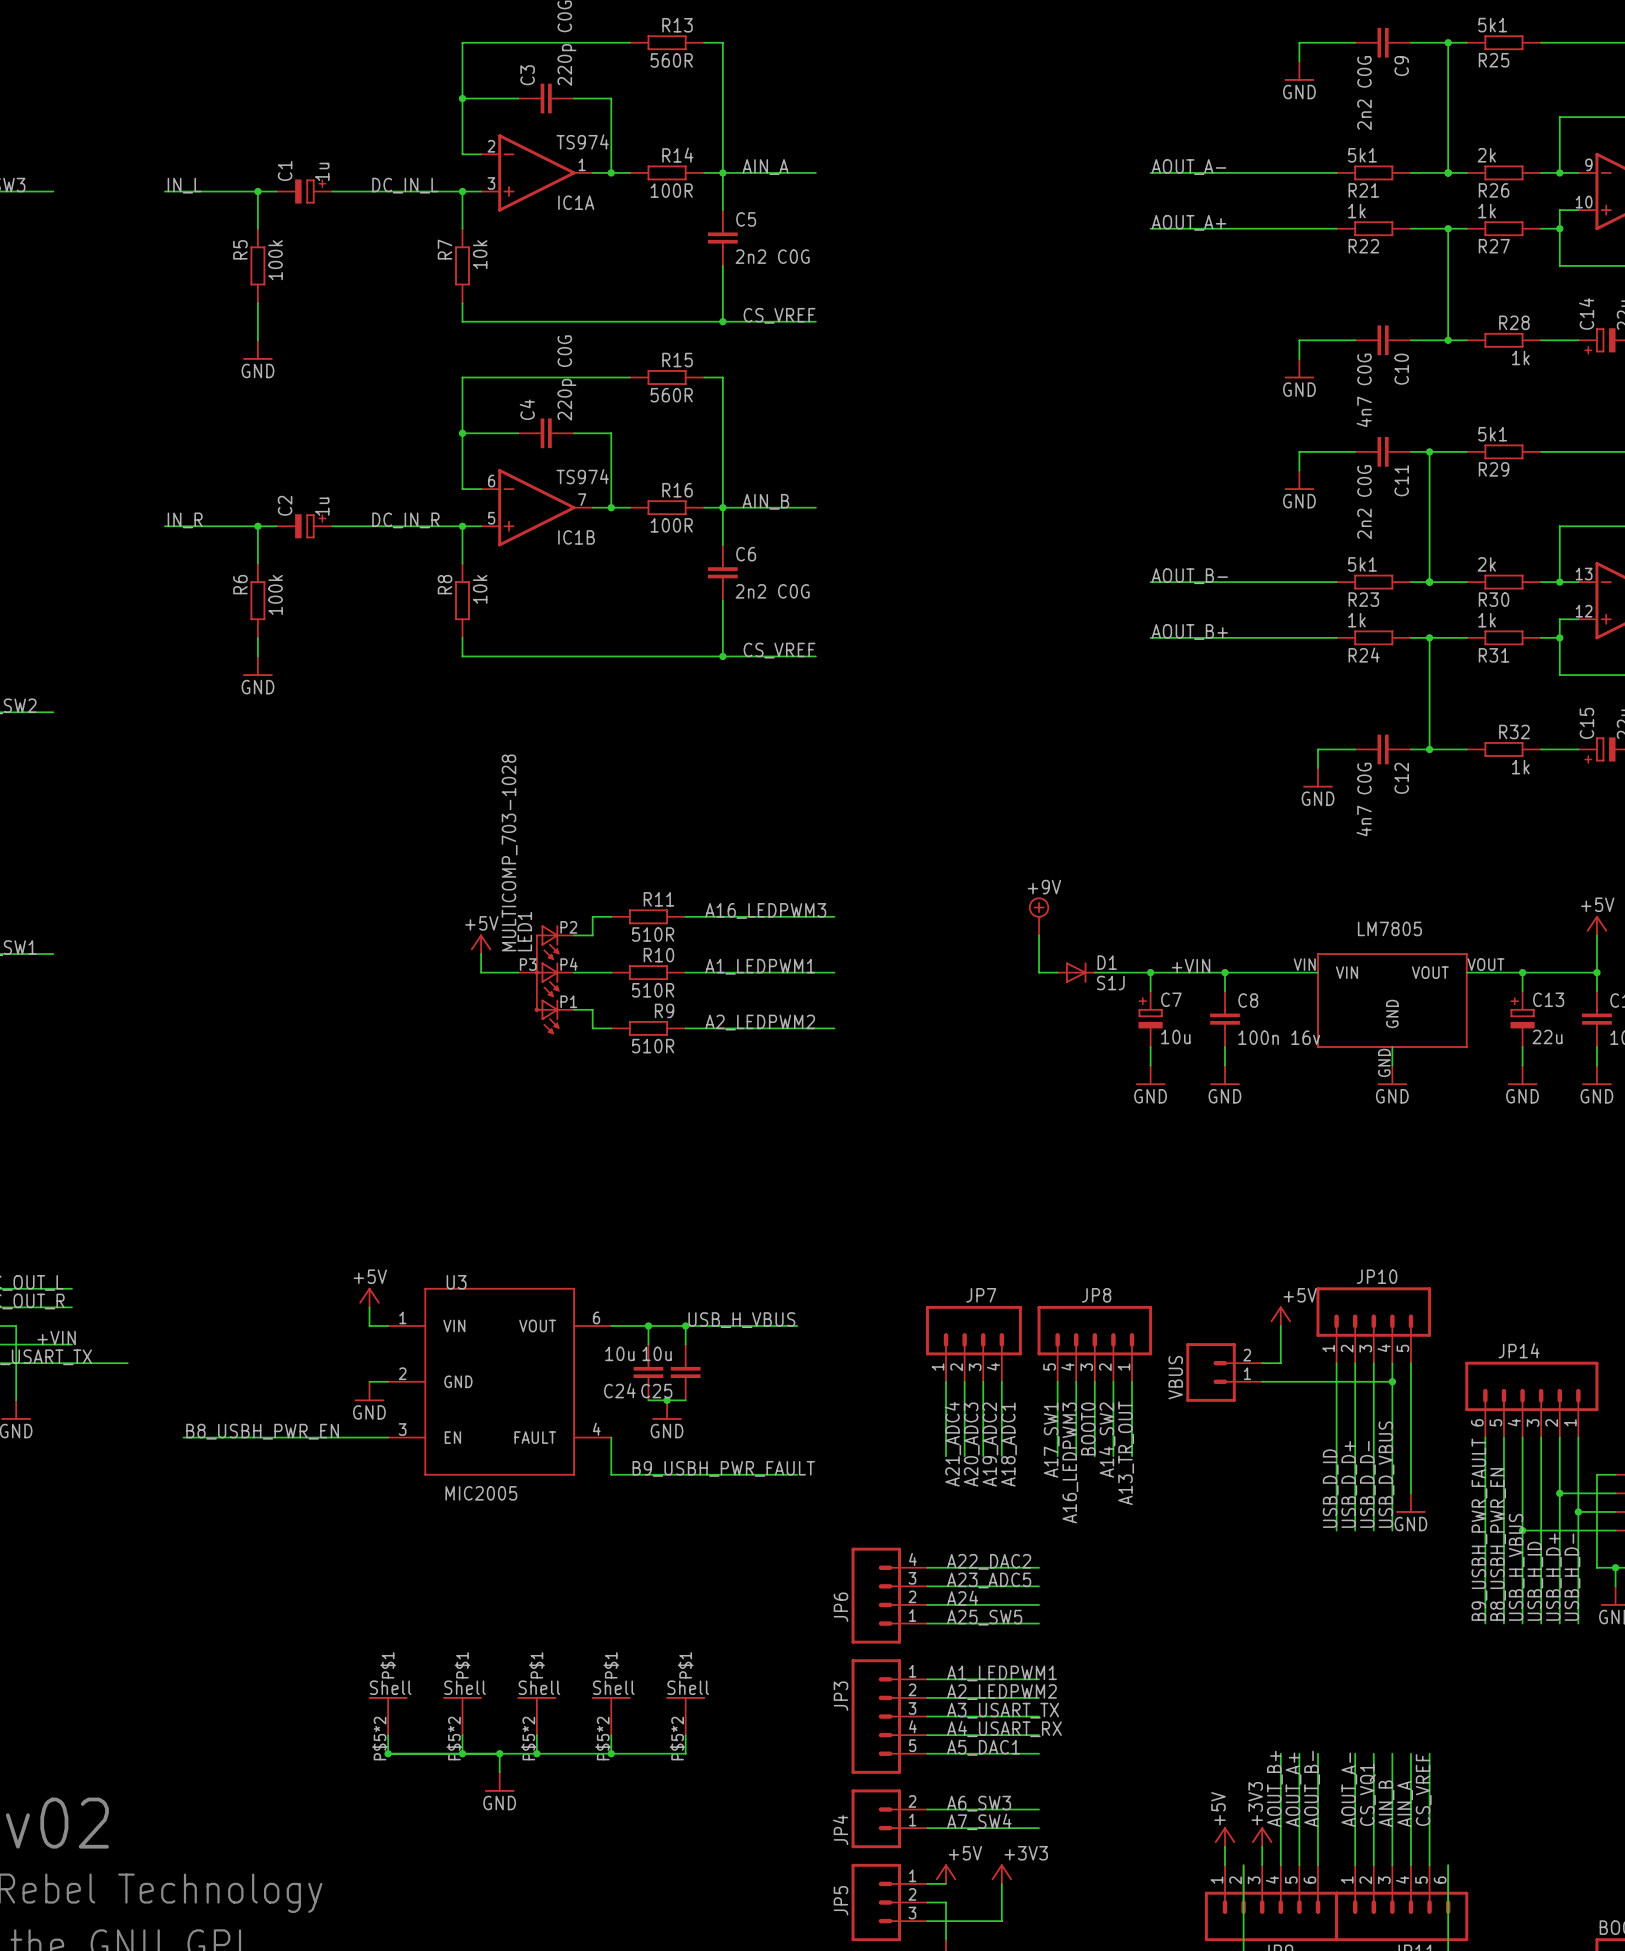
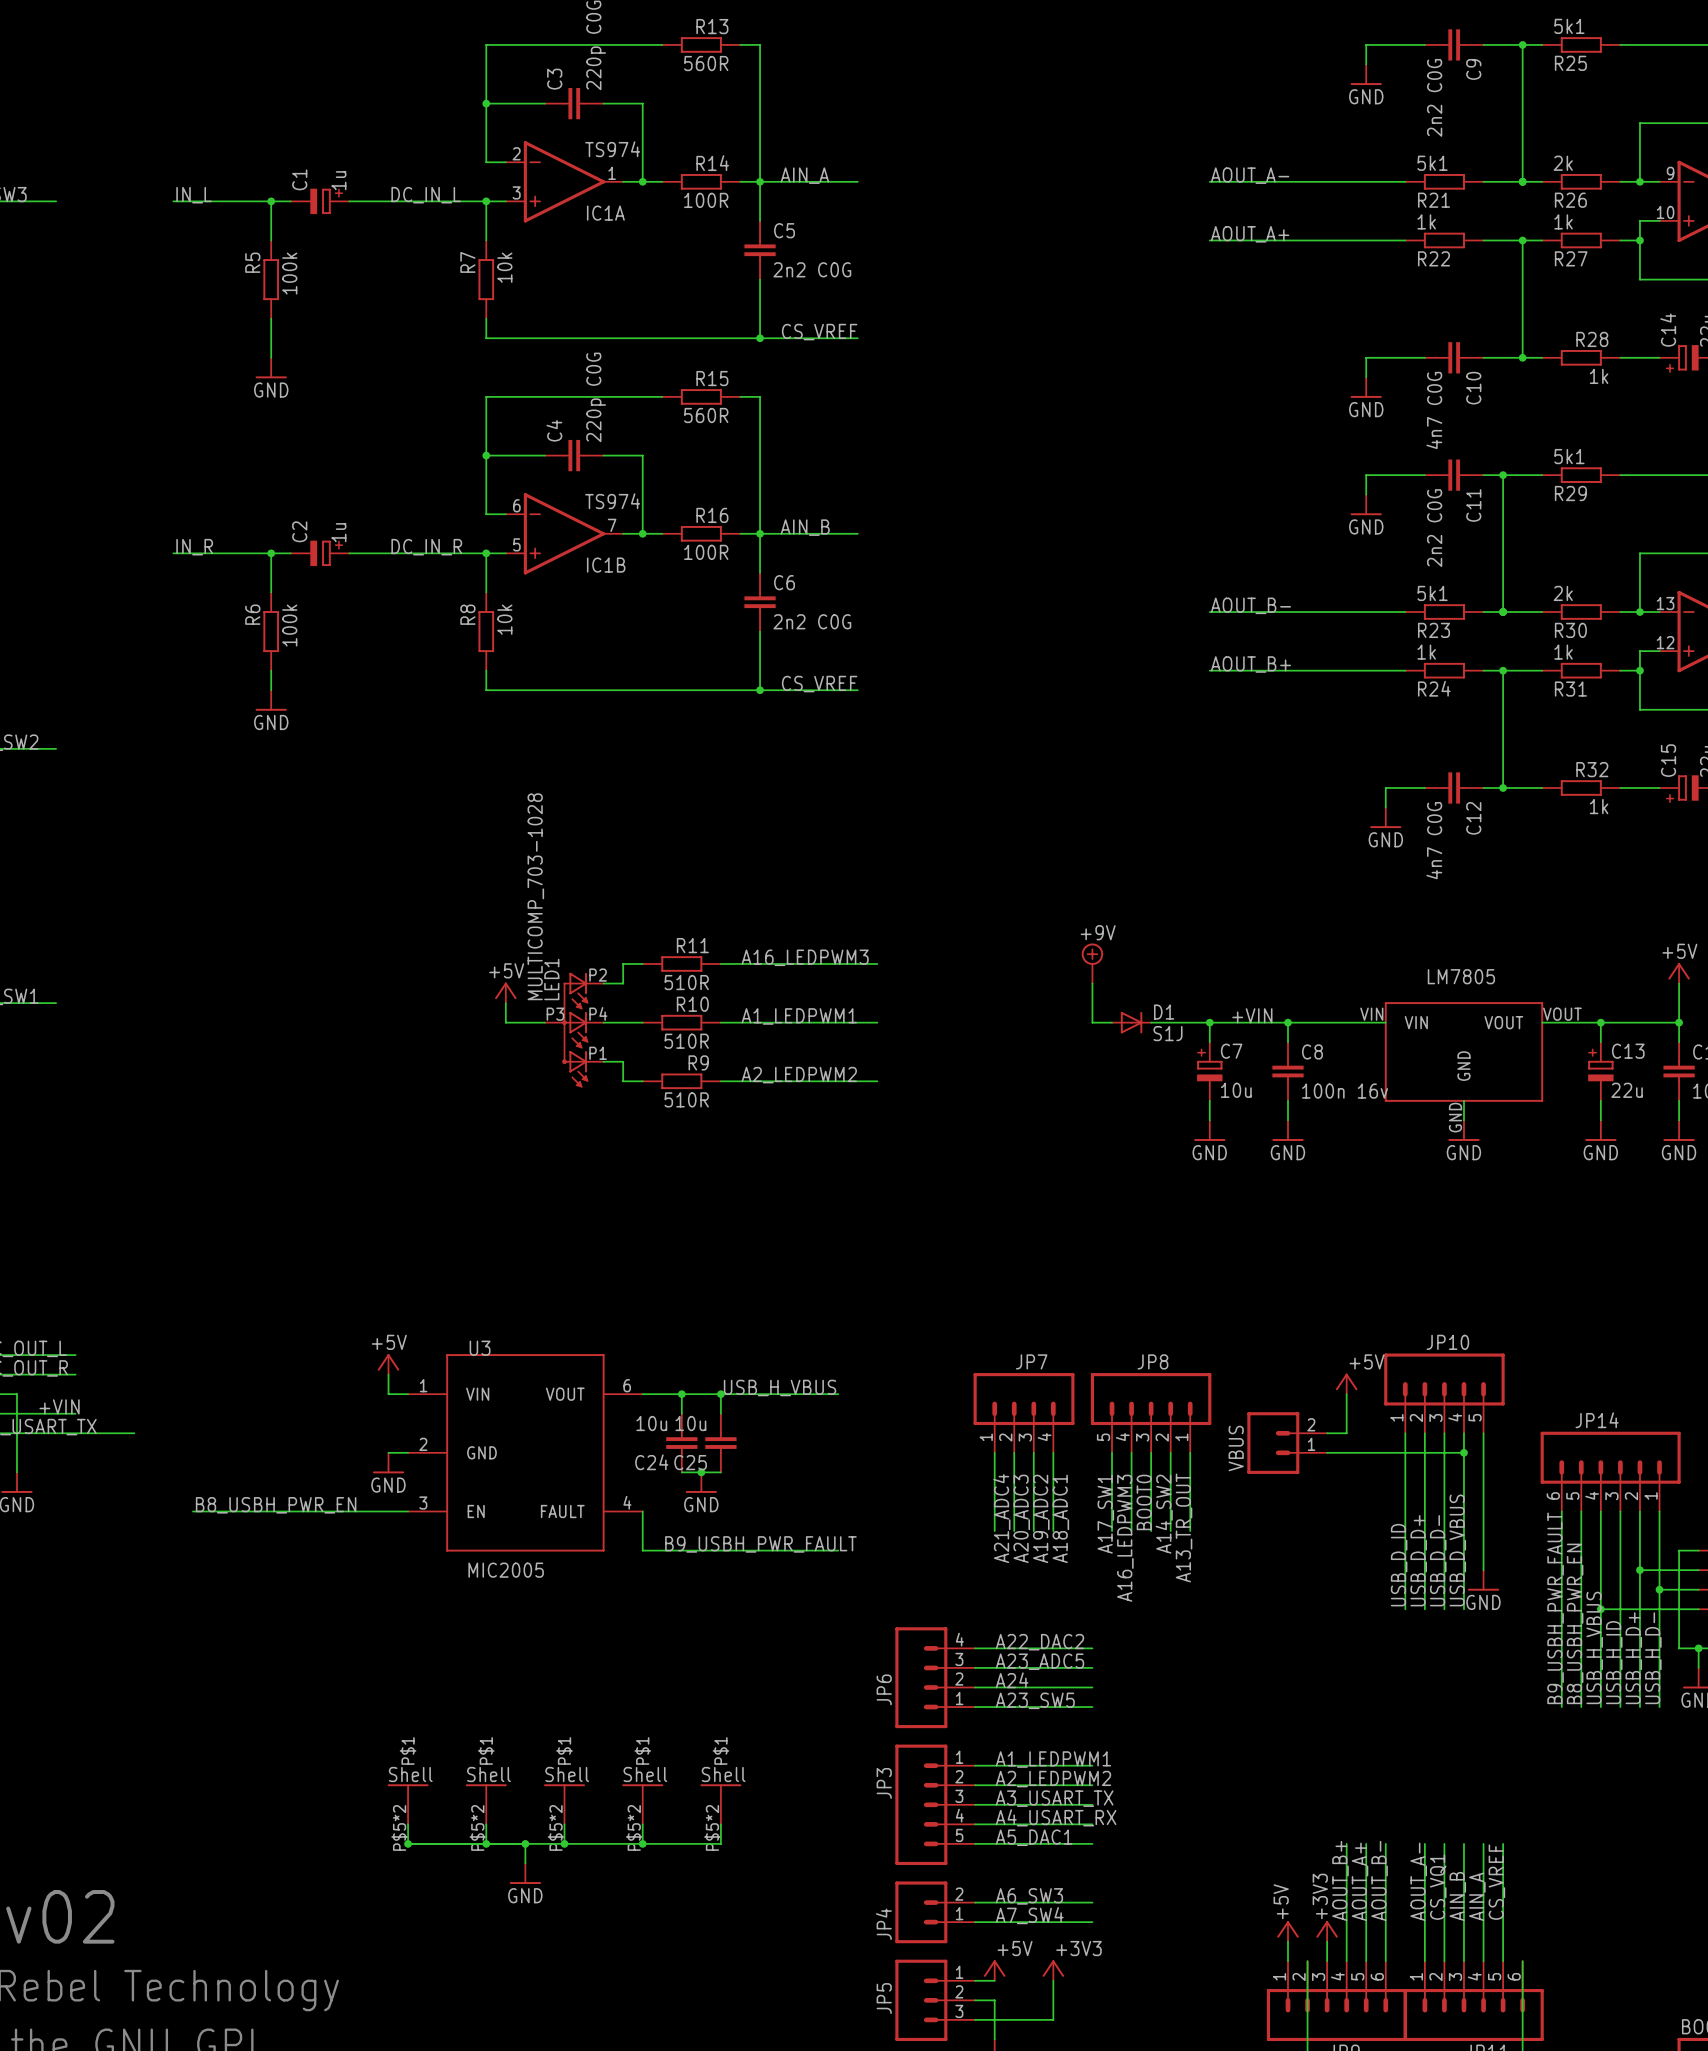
label: A25_SW5 (984, 1617) -> A23_SW5 (1035, 1700)

